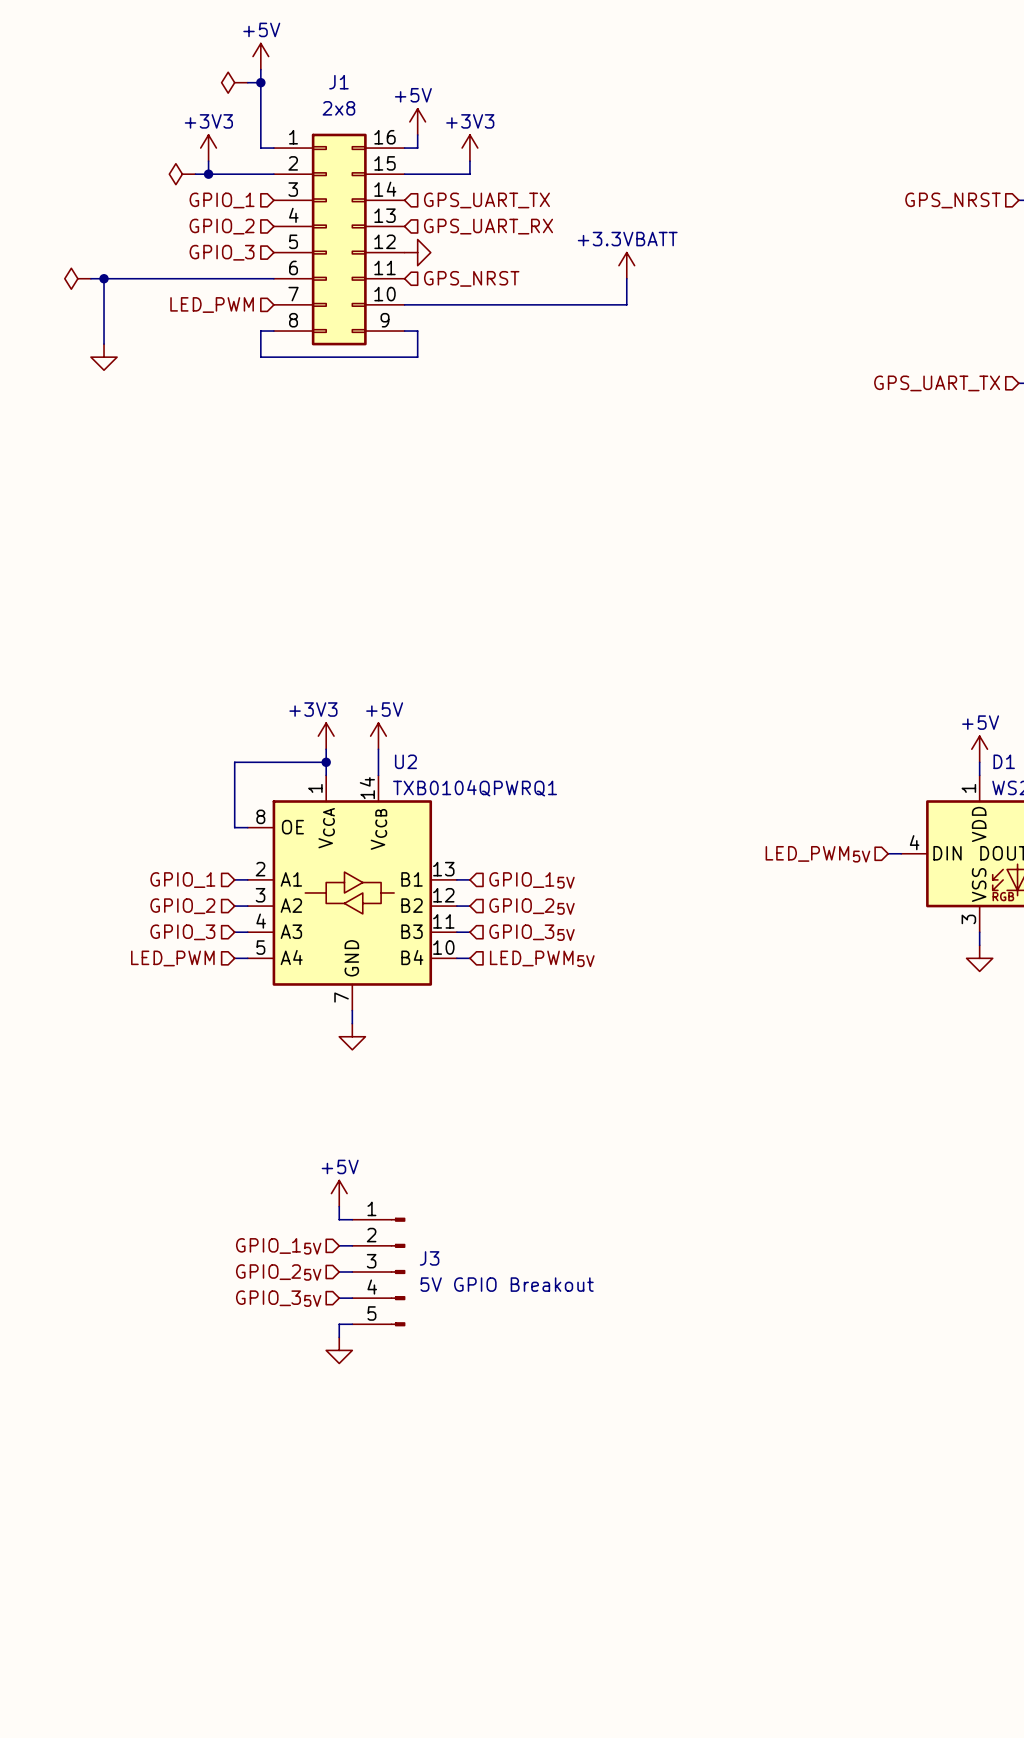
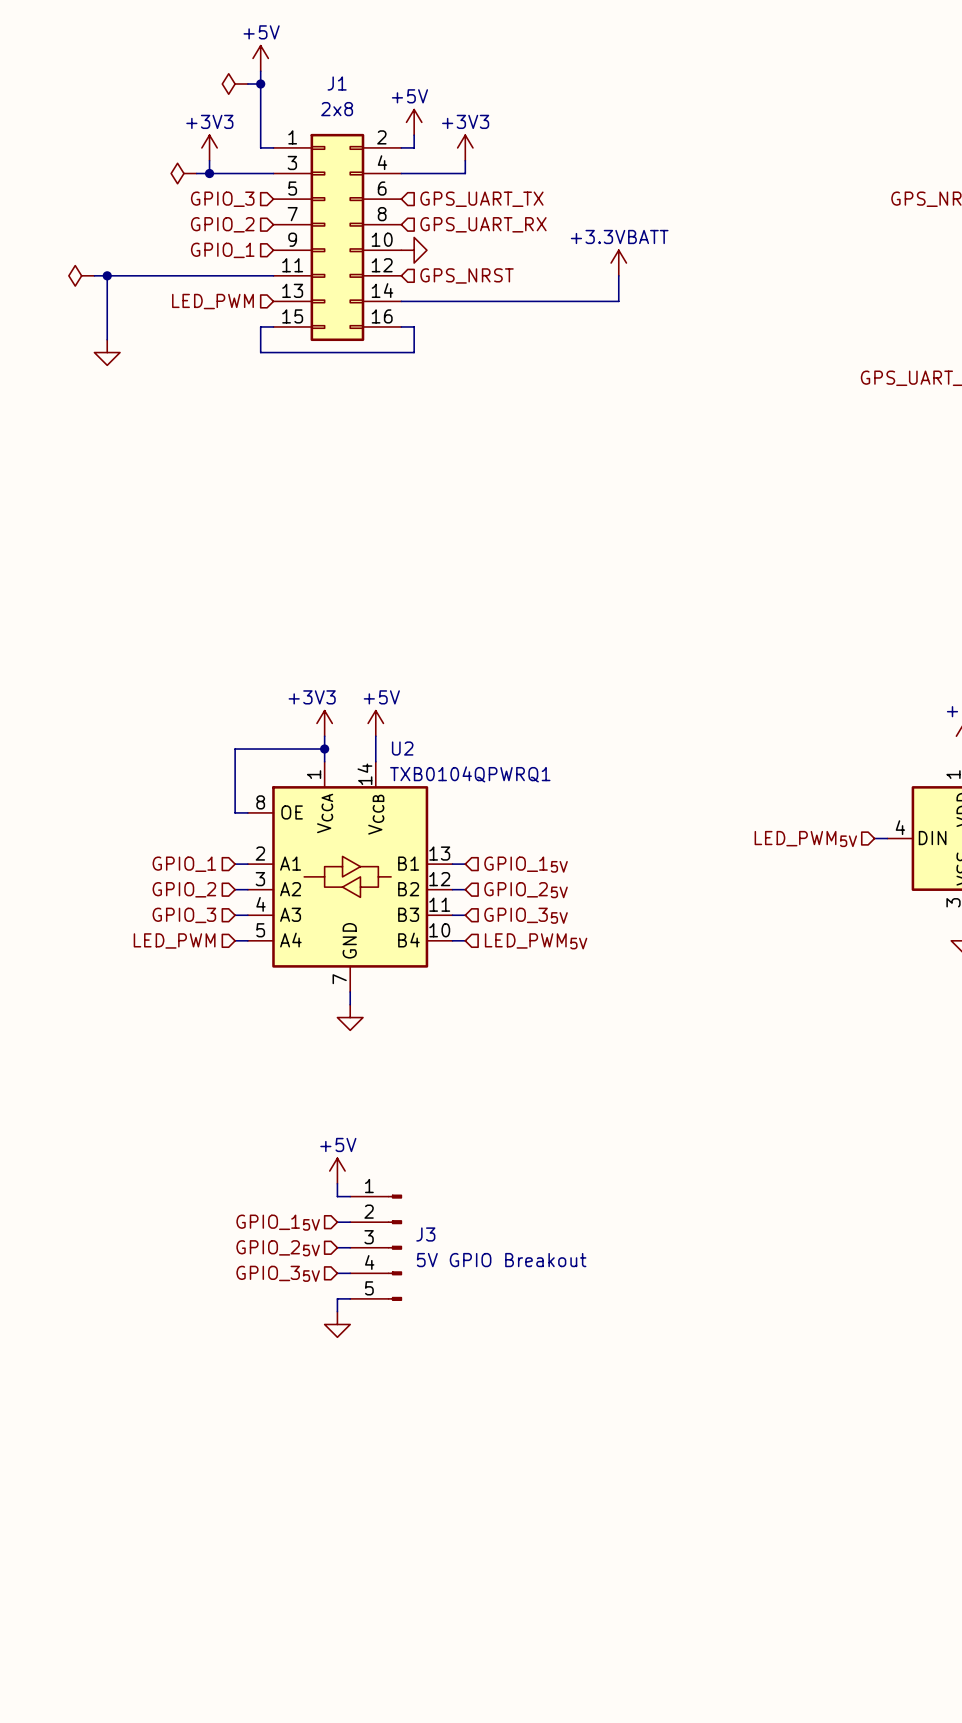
J1 symbol: [273, 133, 405, 346] -> [273, 133, 402, 342]
hierarchical label: GPIO_1 (222, 200) -> GPIO_3 (222, 199)
hierarchical label: GPIO_3 (222, 252) -> GPIO_1 (222, 250)

